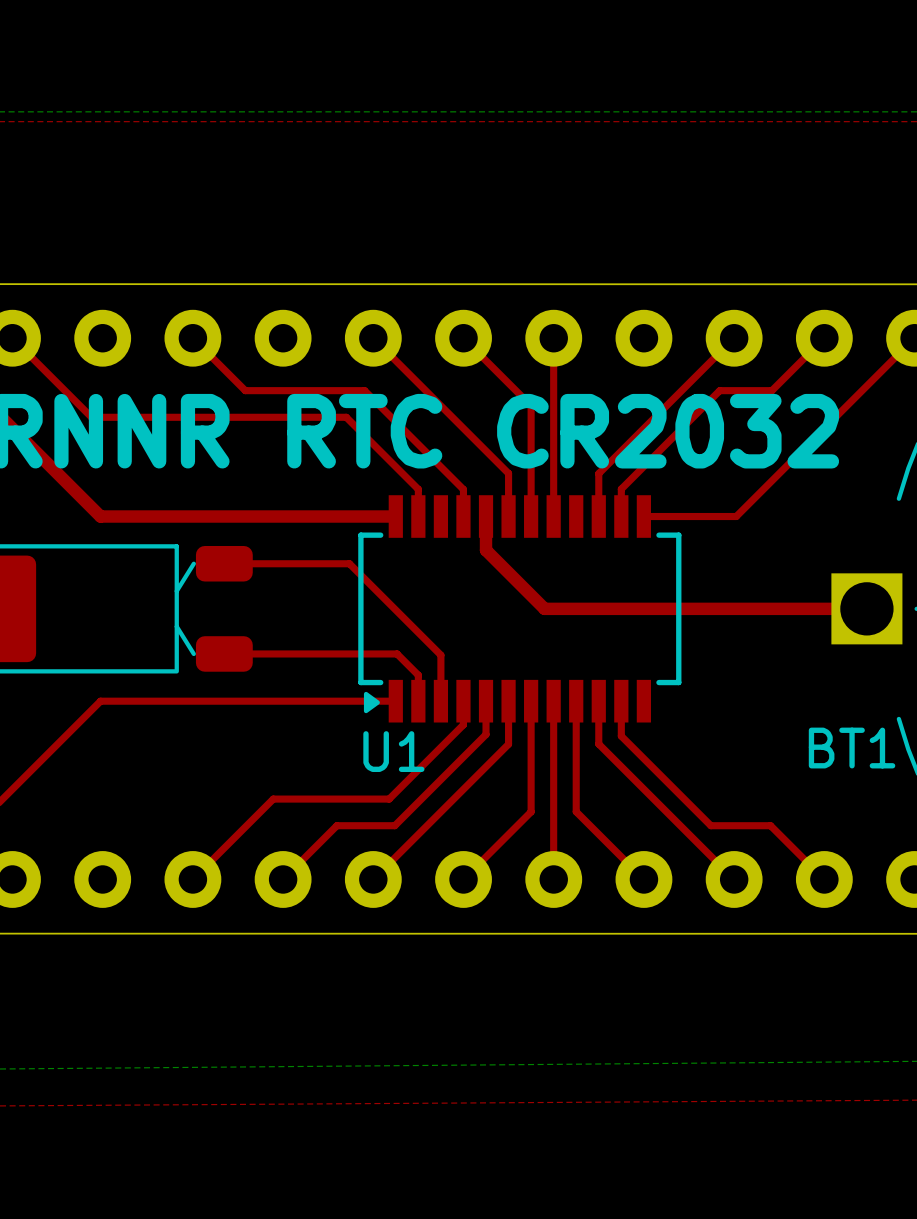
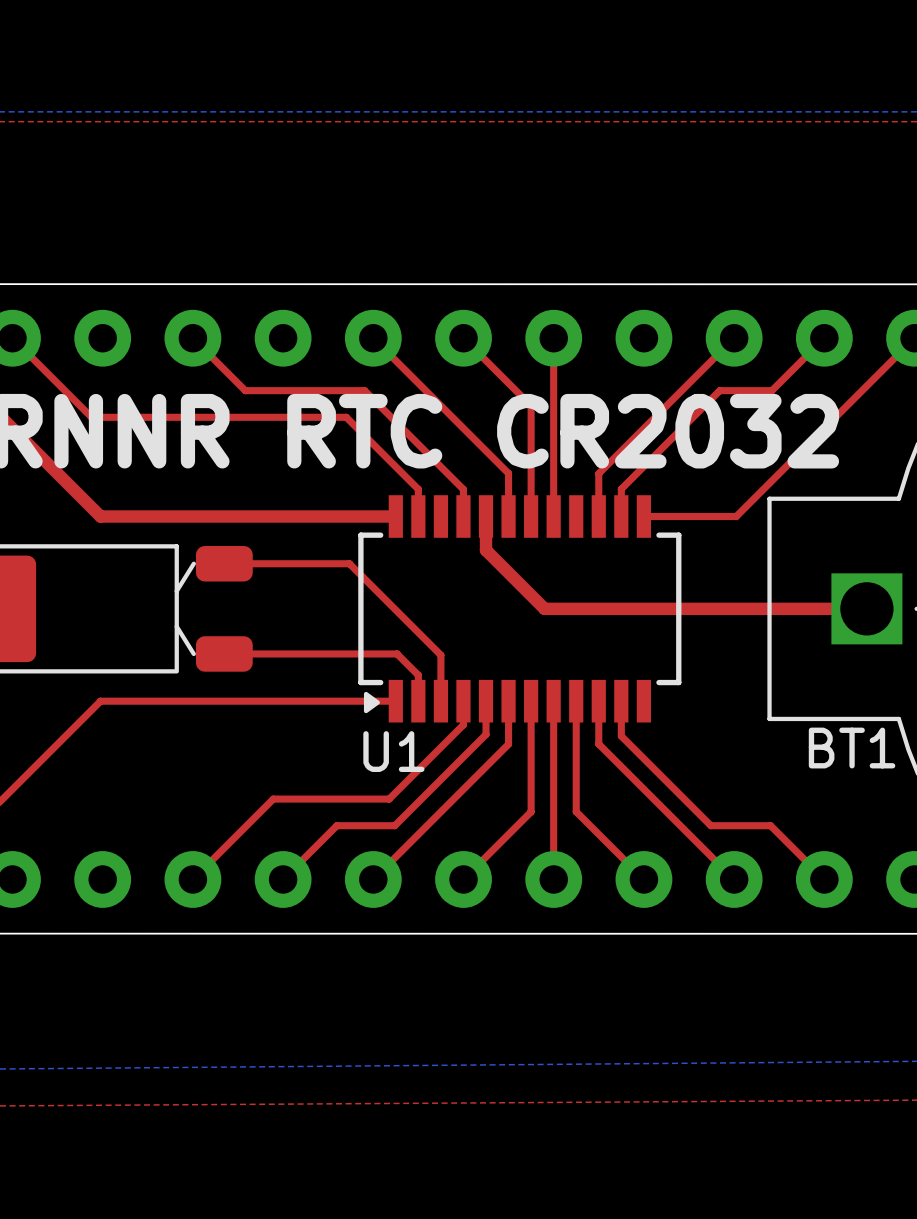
line: none -> (898, 498) (769, 498) (769, 718) (898, 718)

